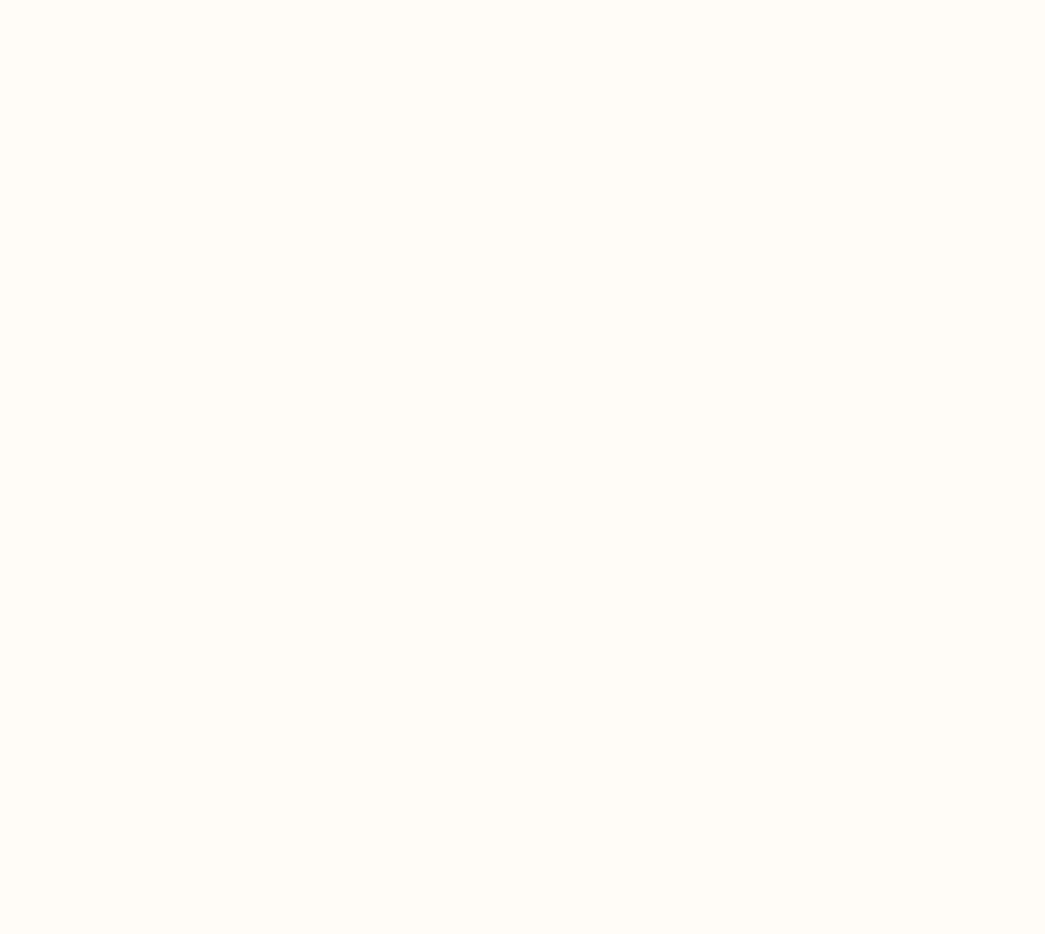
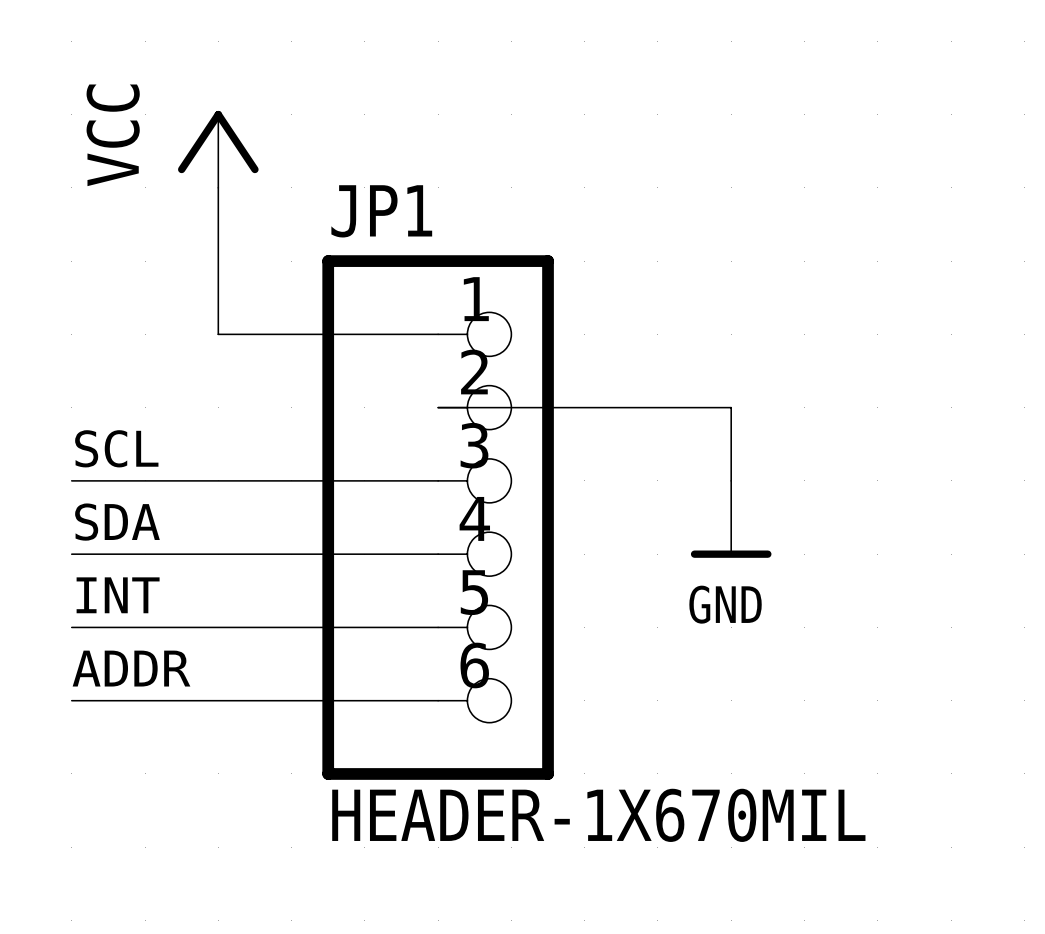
power symbol: none -> VCC (218, 149)
wire: none -> (218, 187) (218, 334) (438, 334)
wire: none -> (438, 407) (731, 407) (731, 480)
label: none -> SCL (116, 448)
wire: none -> (71, 480) (438, 480)
JP1: none -> HEADER-1X670MIL (438, 517)
power symbol: none -> GND (731, 519)
label: none -> SDA (117, 522)
wire: none -> (71, 554) (438, 554)
label: none -> INT (118, 595)
wire: none -> (71, 627) (438, 627)
label: none -> ADDR (131, 668)
wire: none -> (71, 700) (438, 700)

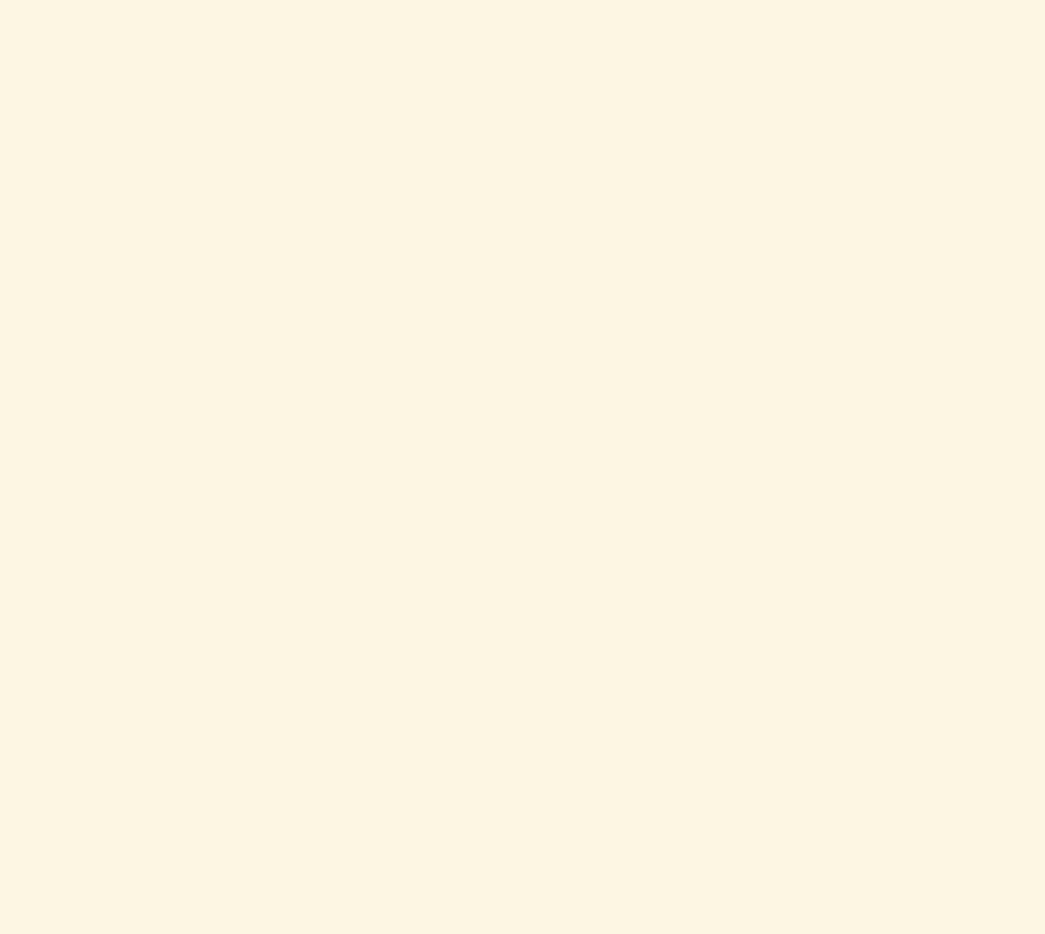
power symbol: VCC (218, 149) -> none
wire: (218, 187) (218, 334) (438, 334) -> none
wire: (438, 407) (731, 407) (731, 480) -> none
label: SCL (116, 448) -> none
wire: (71, 480) (438, 480) -> none
JP1: HEADER-1X670MIL (438, 517) -> none
power symbol: GND (731, 519) -> none
label: SDA (117, 522) -> none
wire: (71, 554) (438, 554) -> none
label: INT (118, 595) -> none
wire: (71, 627) (438, 627) -> none
label: ADDR (131, 668) -> none
wire: (71, 700) (438, 700) -> none

